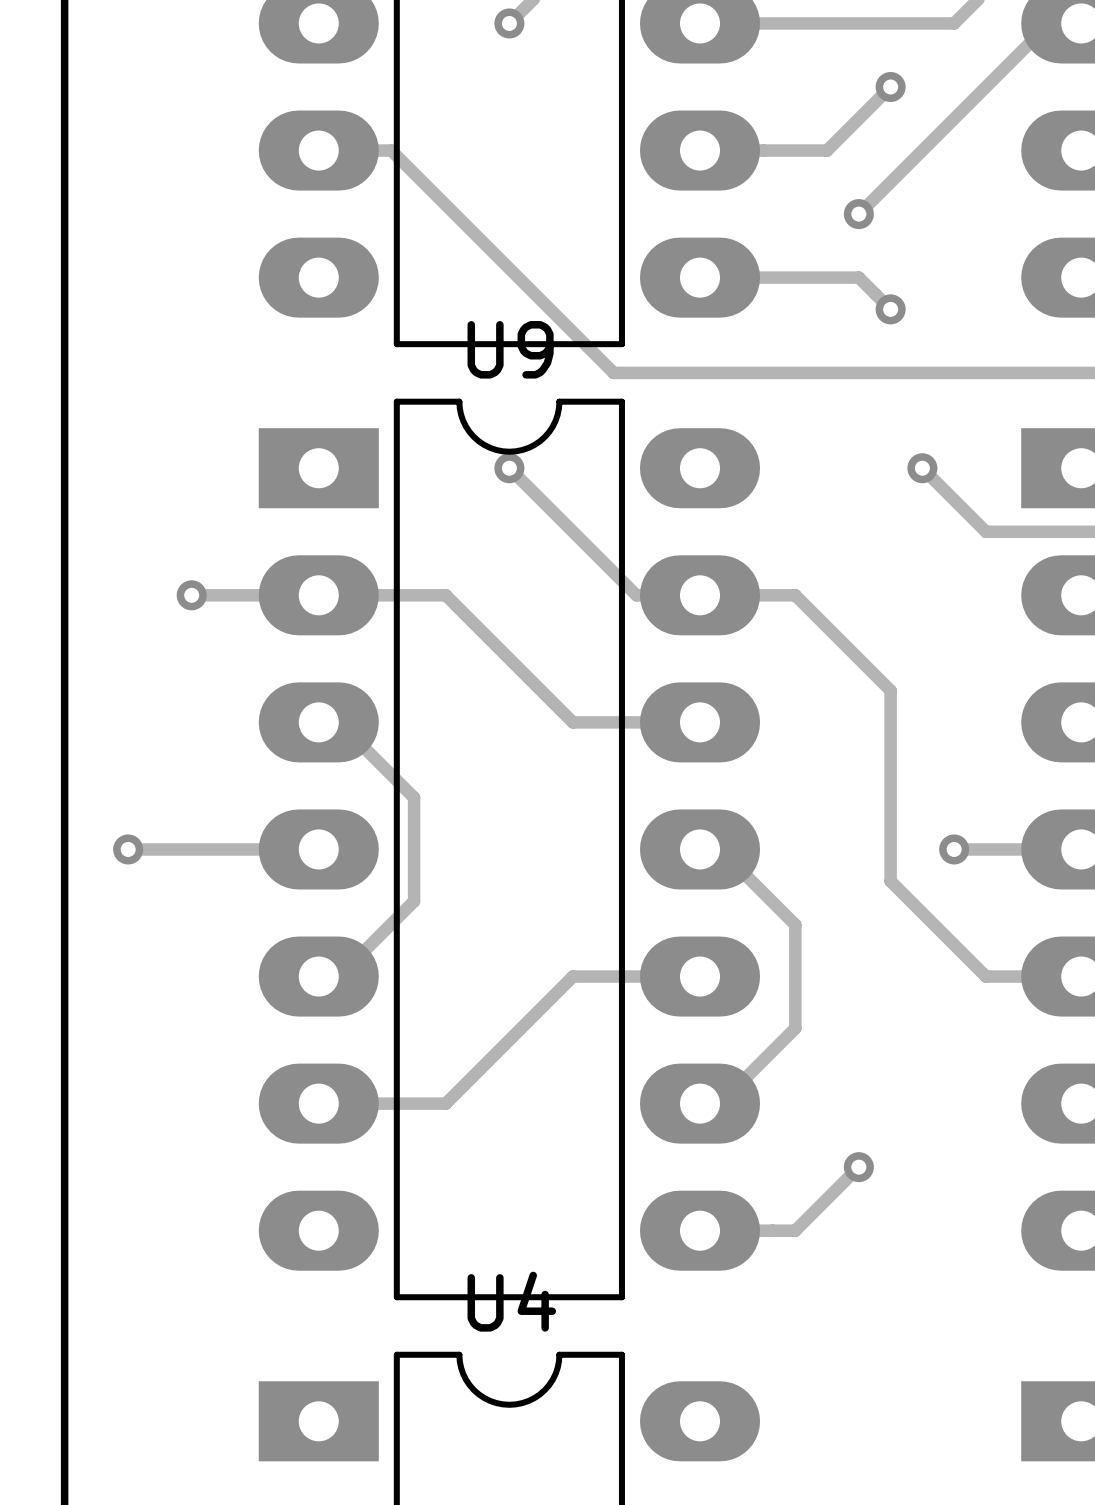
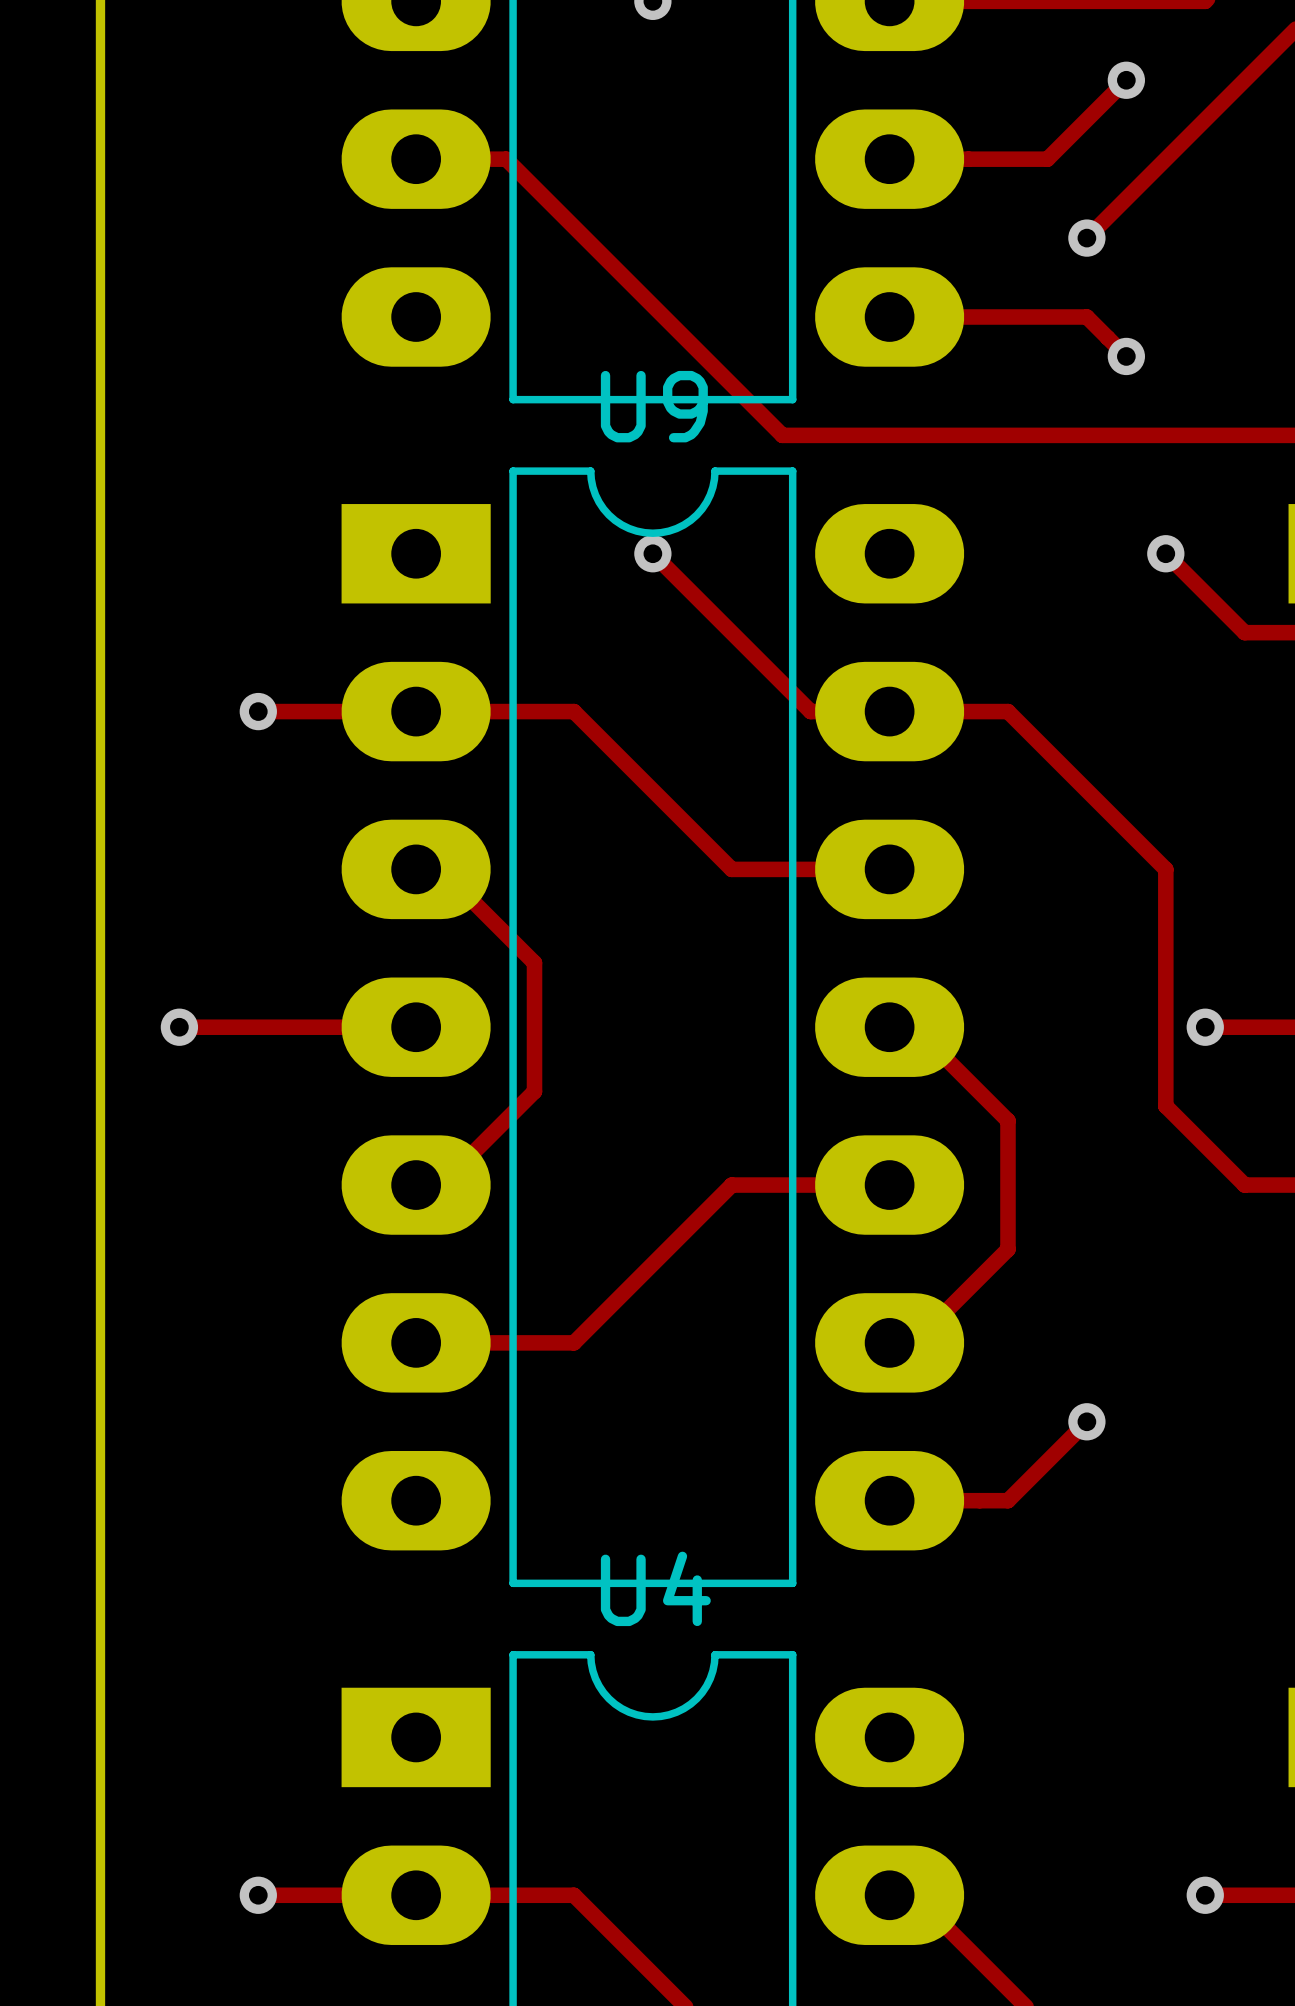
track: (890, 690) (890, 881) (922, 913) -> (1126, 829) (1165, 869) (1165, 1106)

